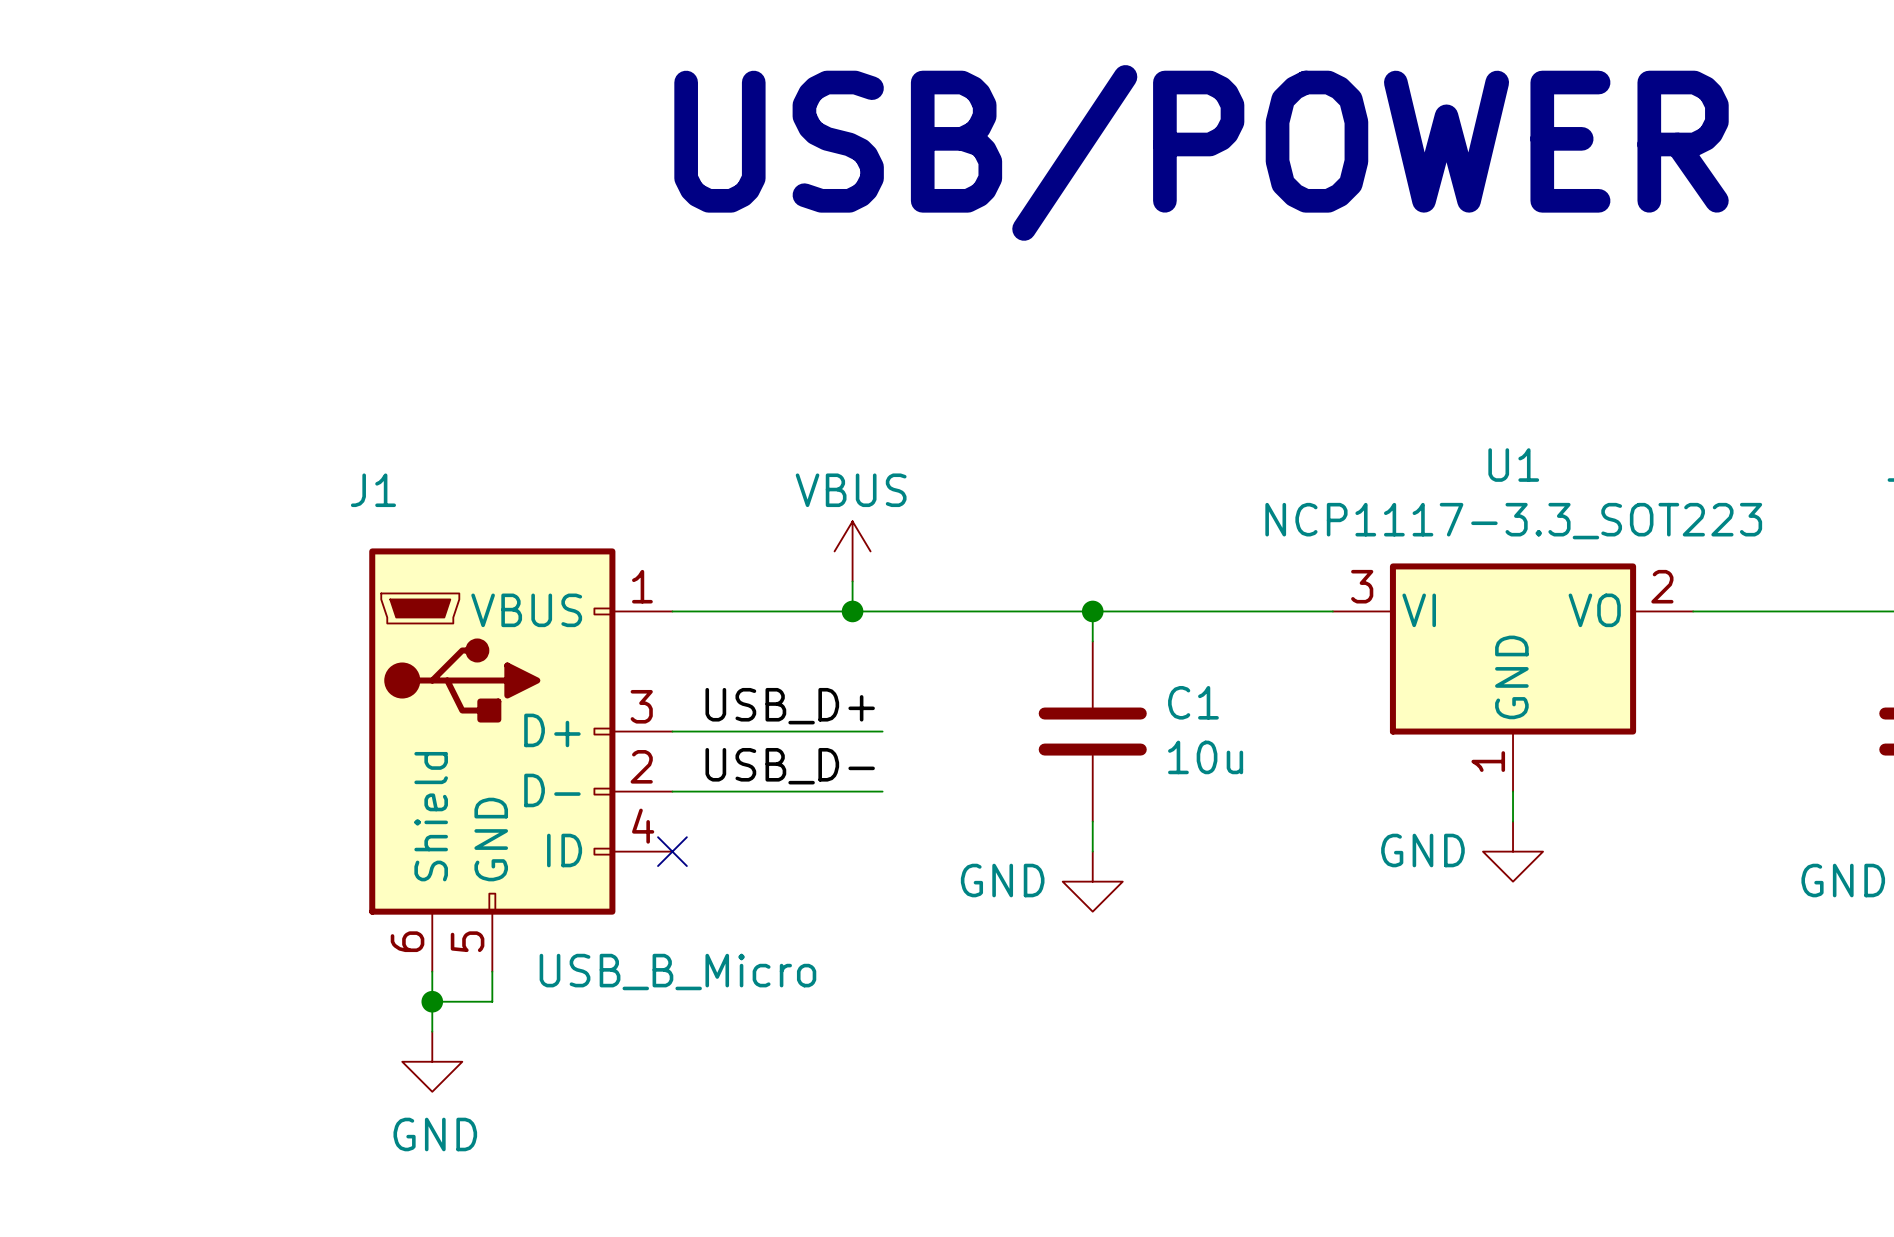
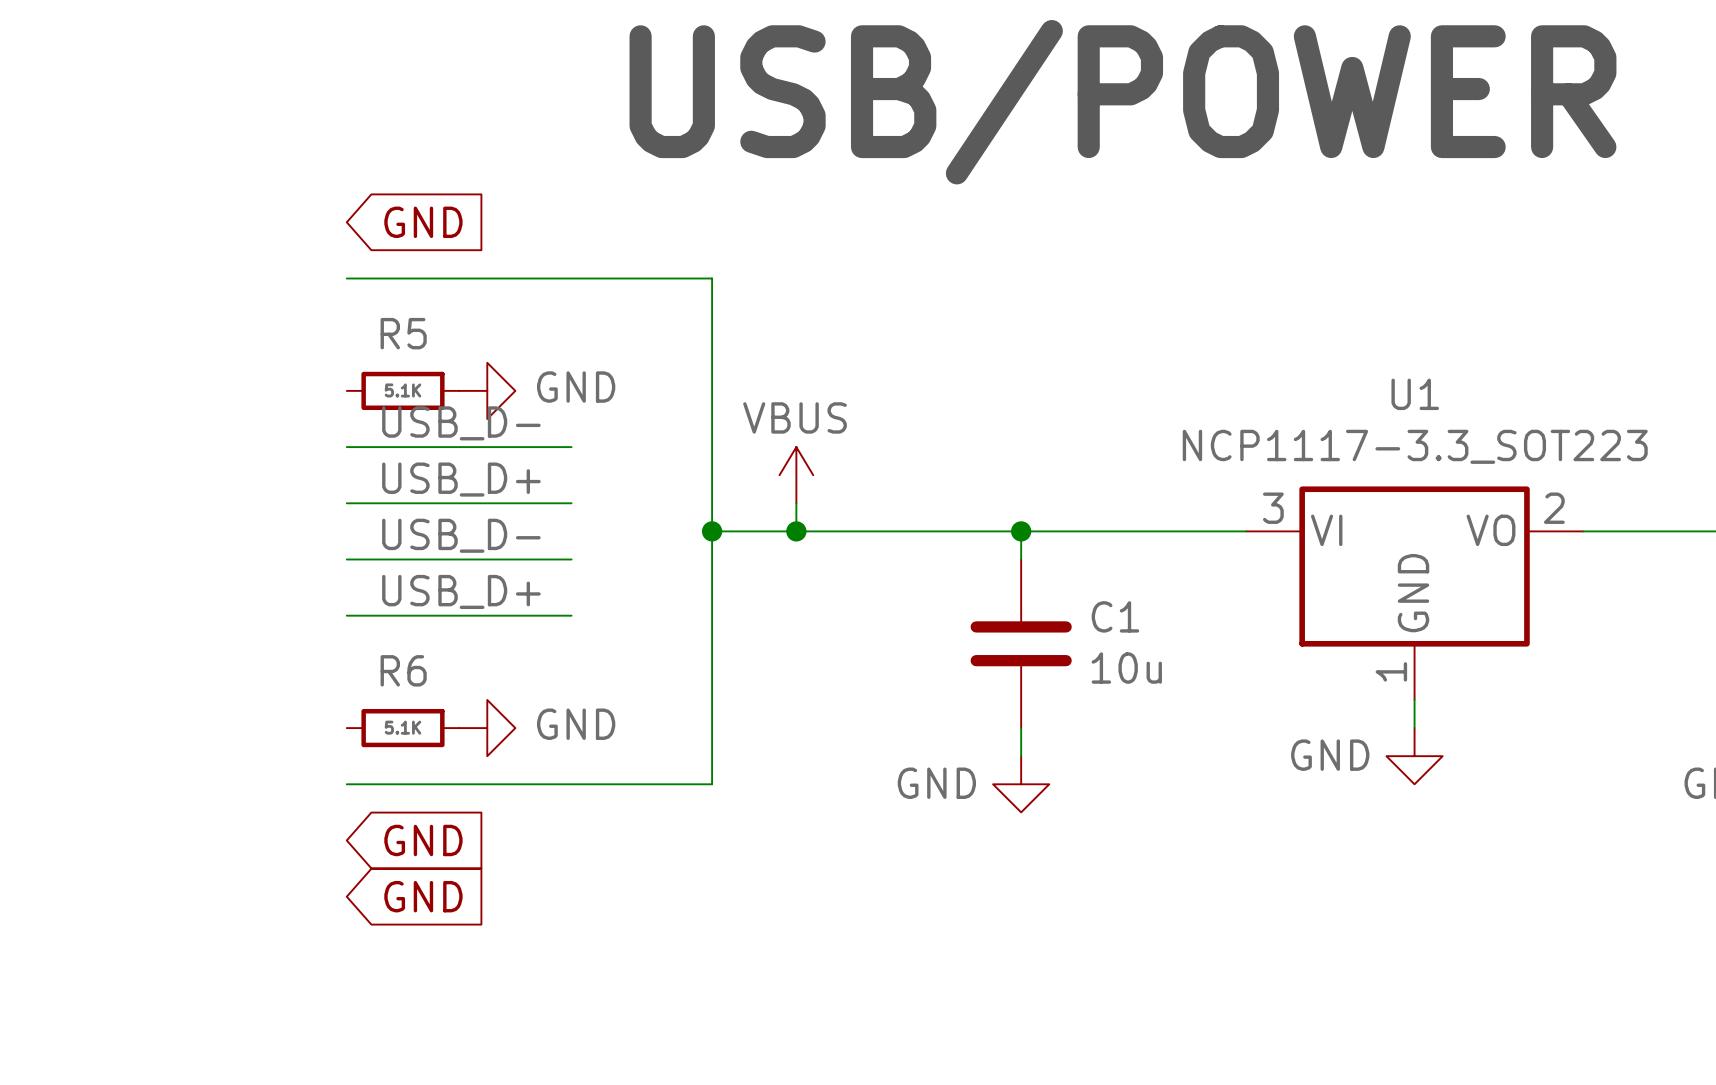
global label: none -> GND (423, 222)
wire: none -> (346, 278) (712, 278) (712, 784) (346, 784)
R5: none -> 5.1K (402, 390)
power symbol: none -> GND (487, 390)
label: none -> USB_D- (461, 423)
wire: none -> (346, 447) (571, 447)
label: none -> USB_D+ (461, 479)
wire: (672, 611) (762, 611) -> none
junction: none -> (712, 531)
label: none -> USB_D- (461, 535)
label: none -> USB_D+ (461, 591)
label: USB_D+ (790, 706) -> none
wire: (672, 731) (882, 731) -> none
J1: USB_B_Micro (520, 760) -> none
label: USB_D- (790, 766) -> none
wire: (672, 791) (882, 791) -> none
R6: none -> 5.1K (402, 728)
no-connect mark: (672, 851) -> none
global label: none -> GND (423, 840)
wire: (432, 971) (432, 1031) -> none
wire: (492, 971) (492, 1001) (432, 1001) -> none
junction: (432, 1001) -> none
global label: none -> GND (423, 896)
power symbol rotation: 0° (432, 1061) -> 90° counterclockwise (487, 728)
power symbol position: GND (432, 1061) -> GND (487, 728)

